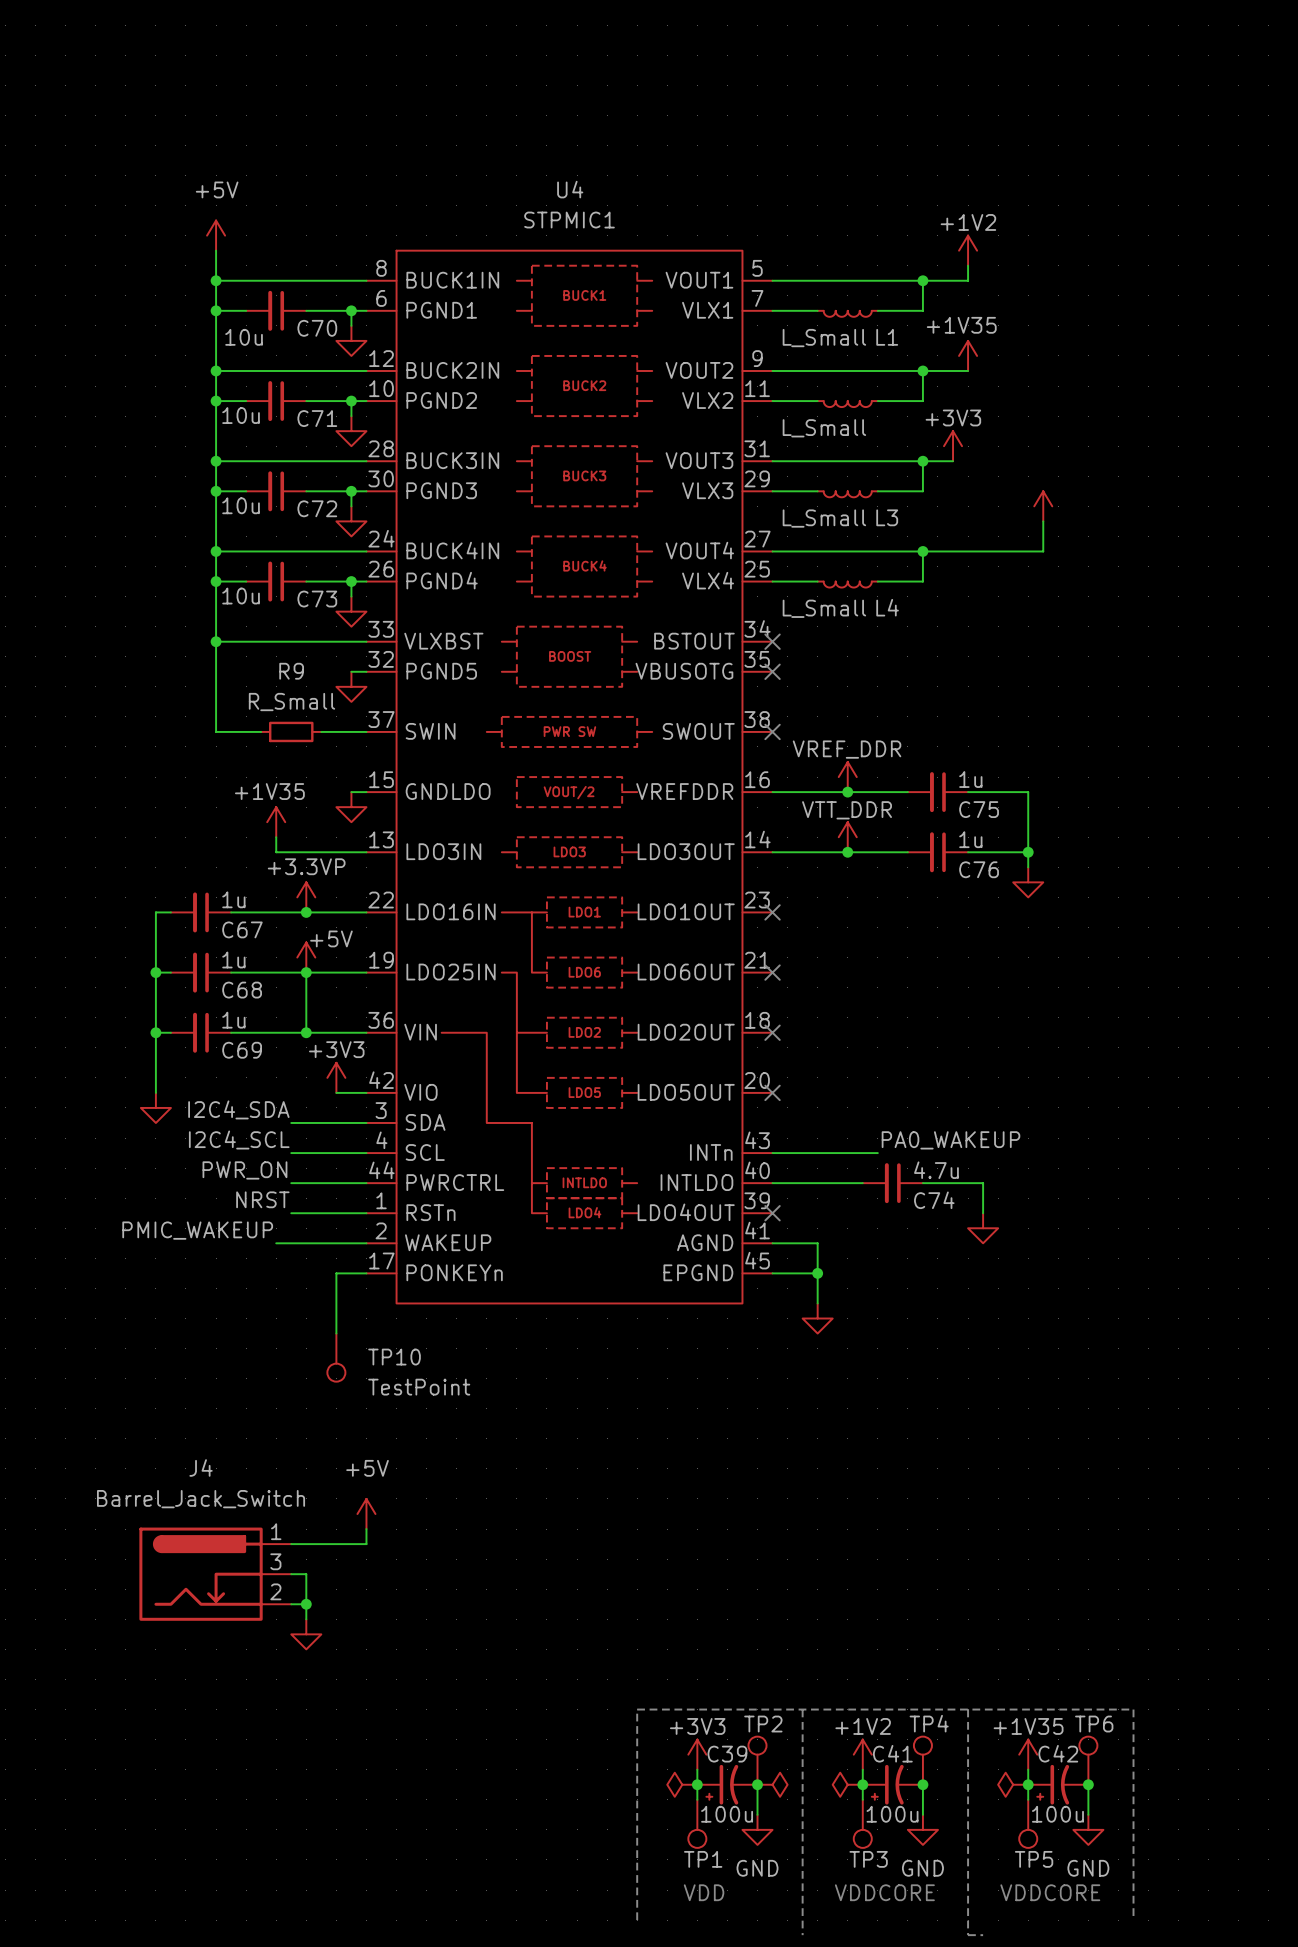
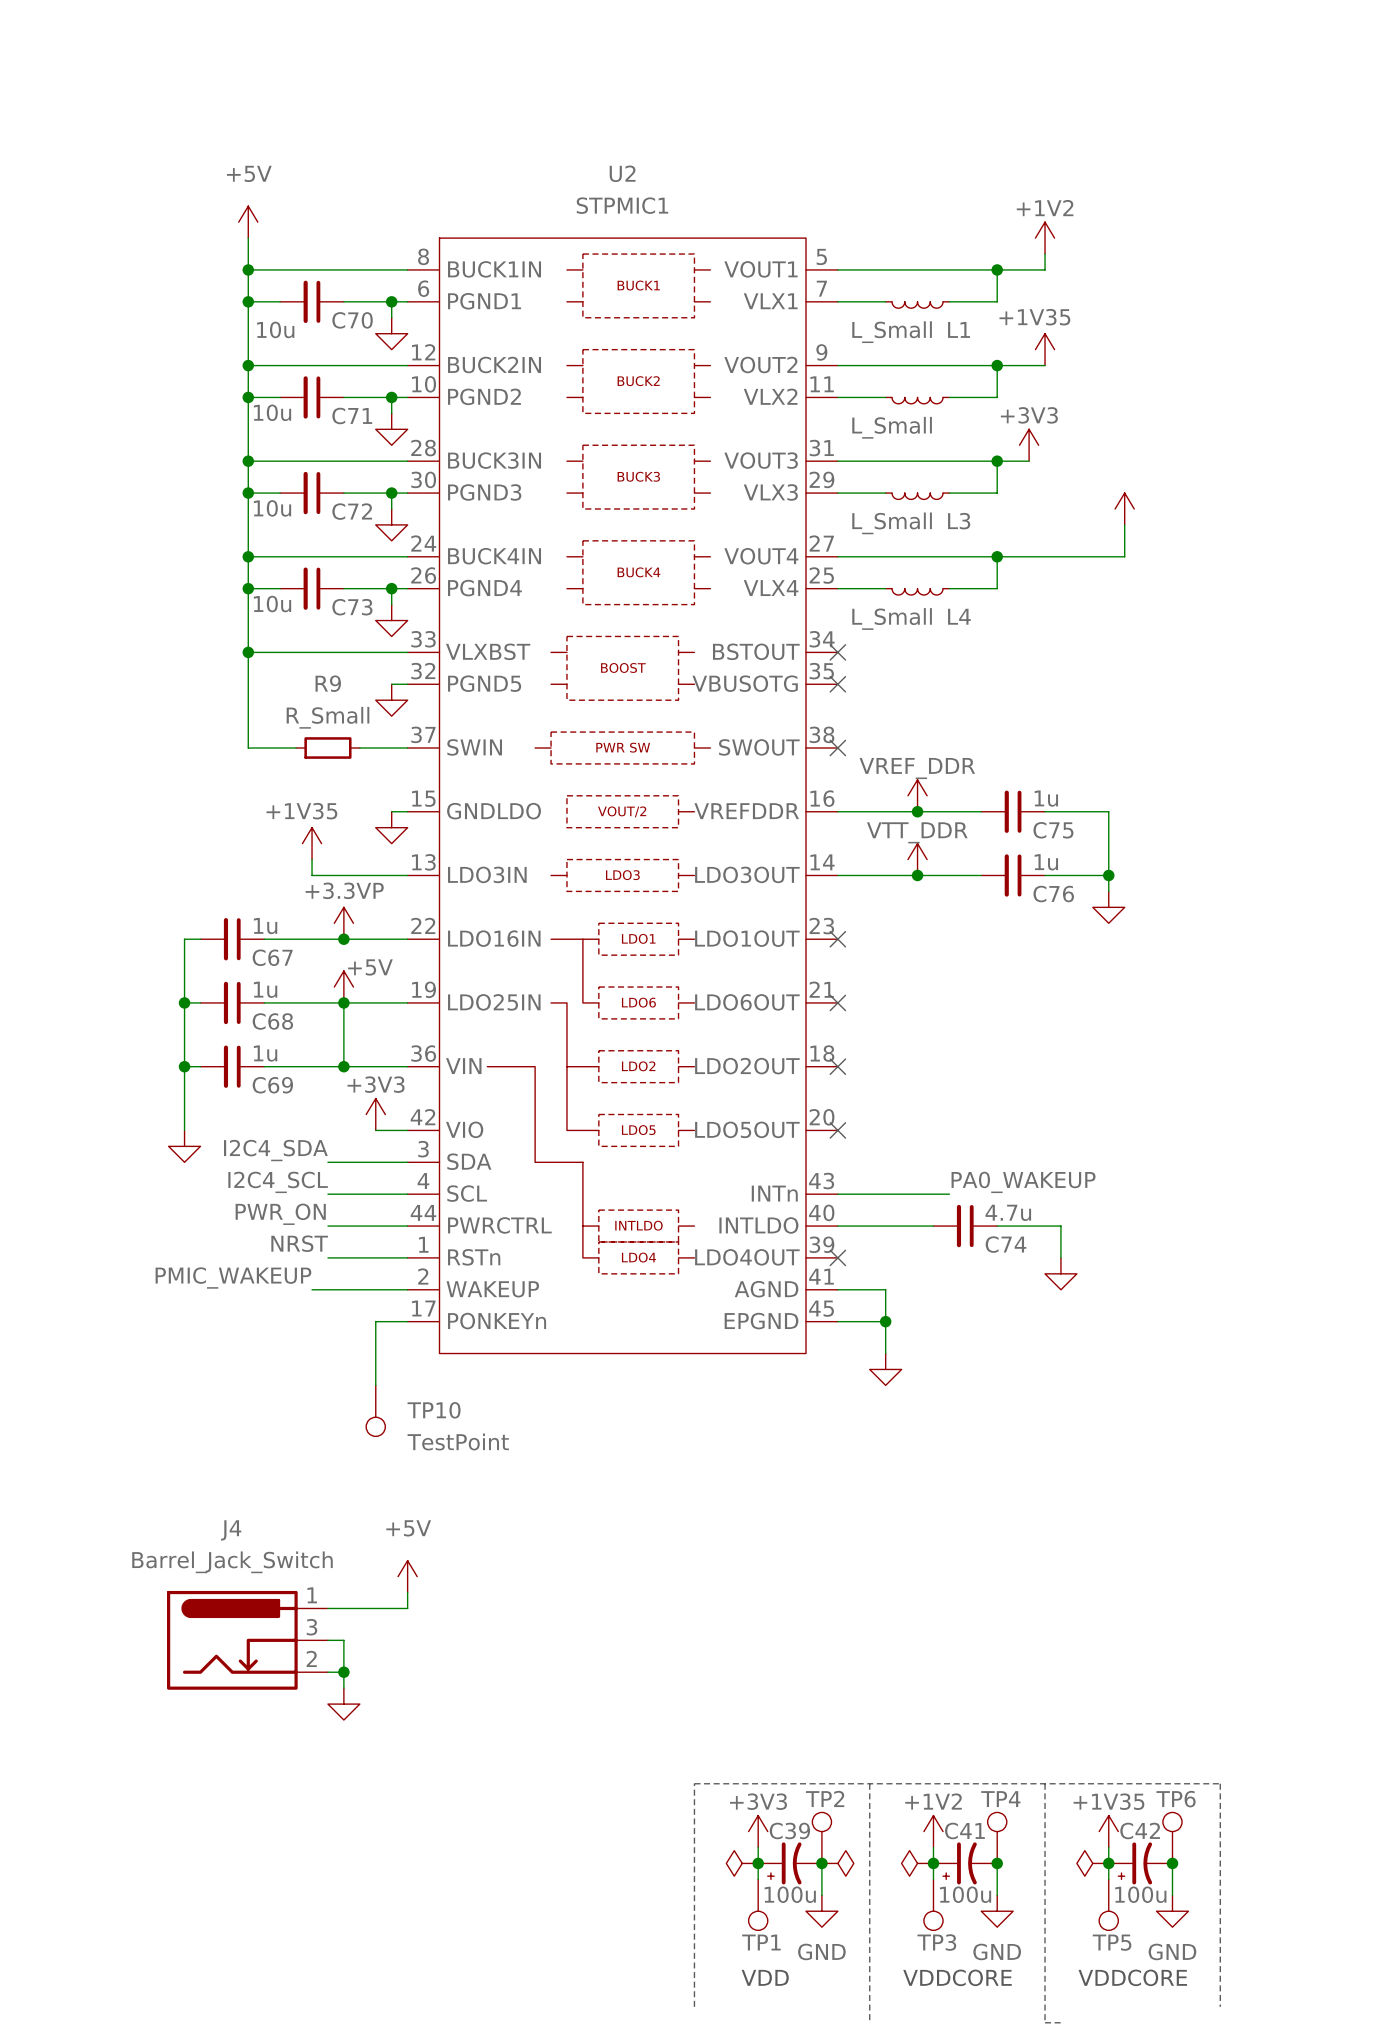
U4 name: U4 (570, 189) -> U2 (622, 173)

